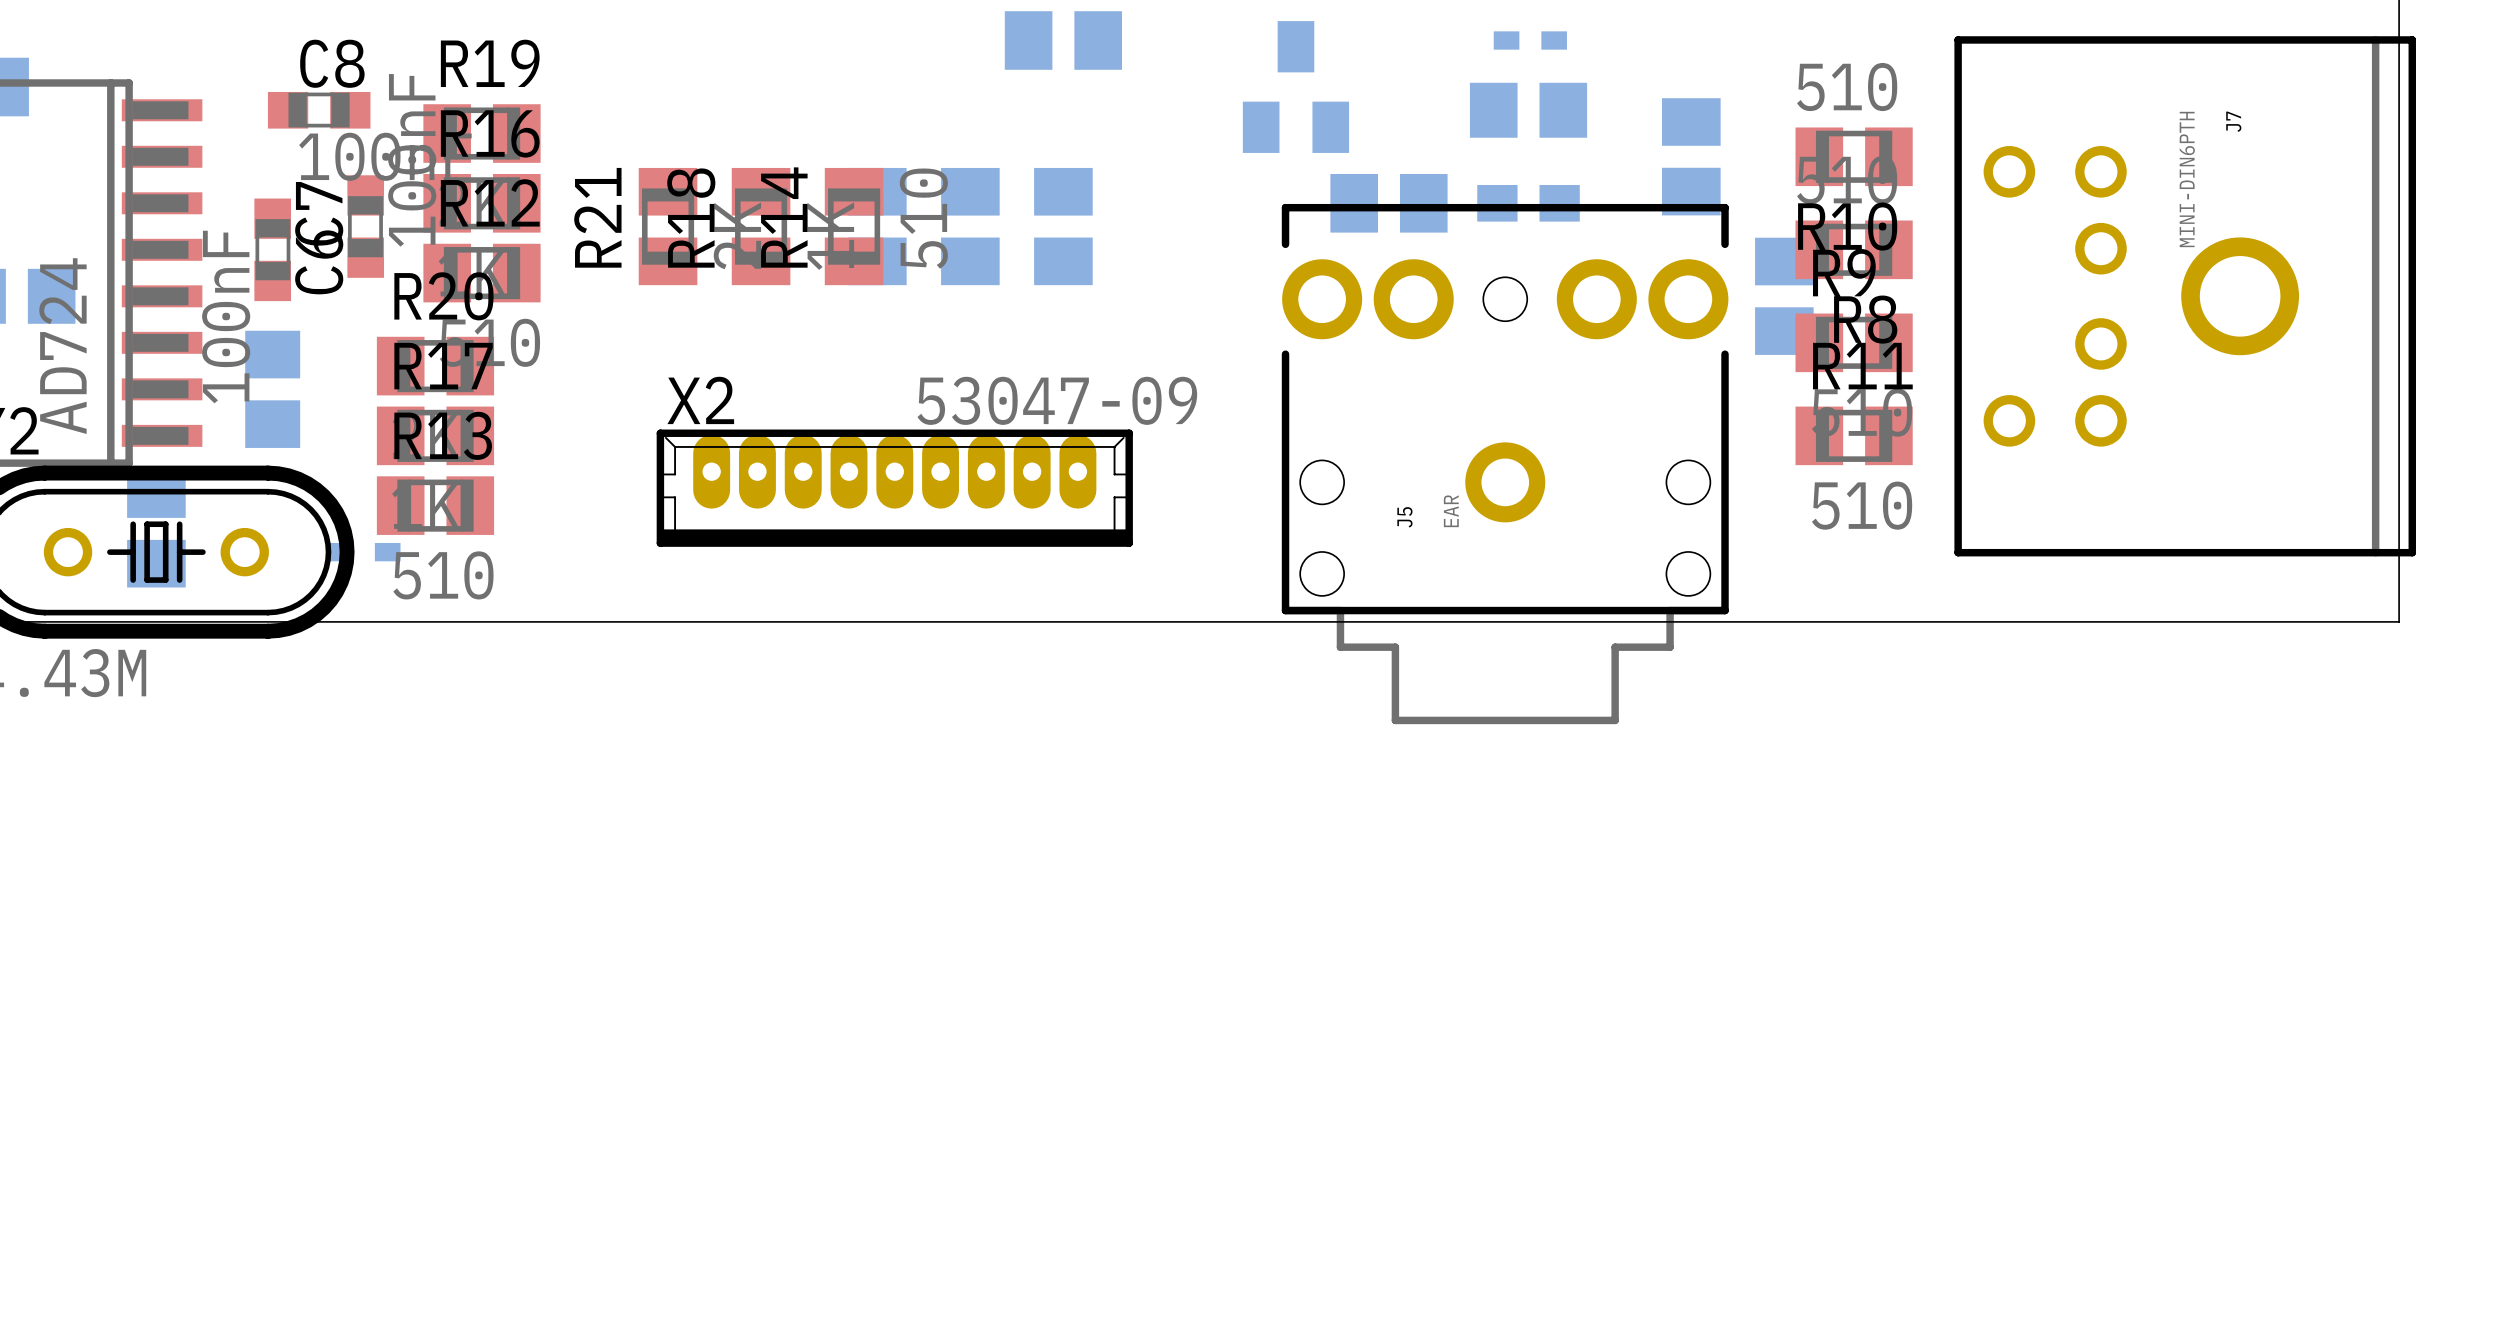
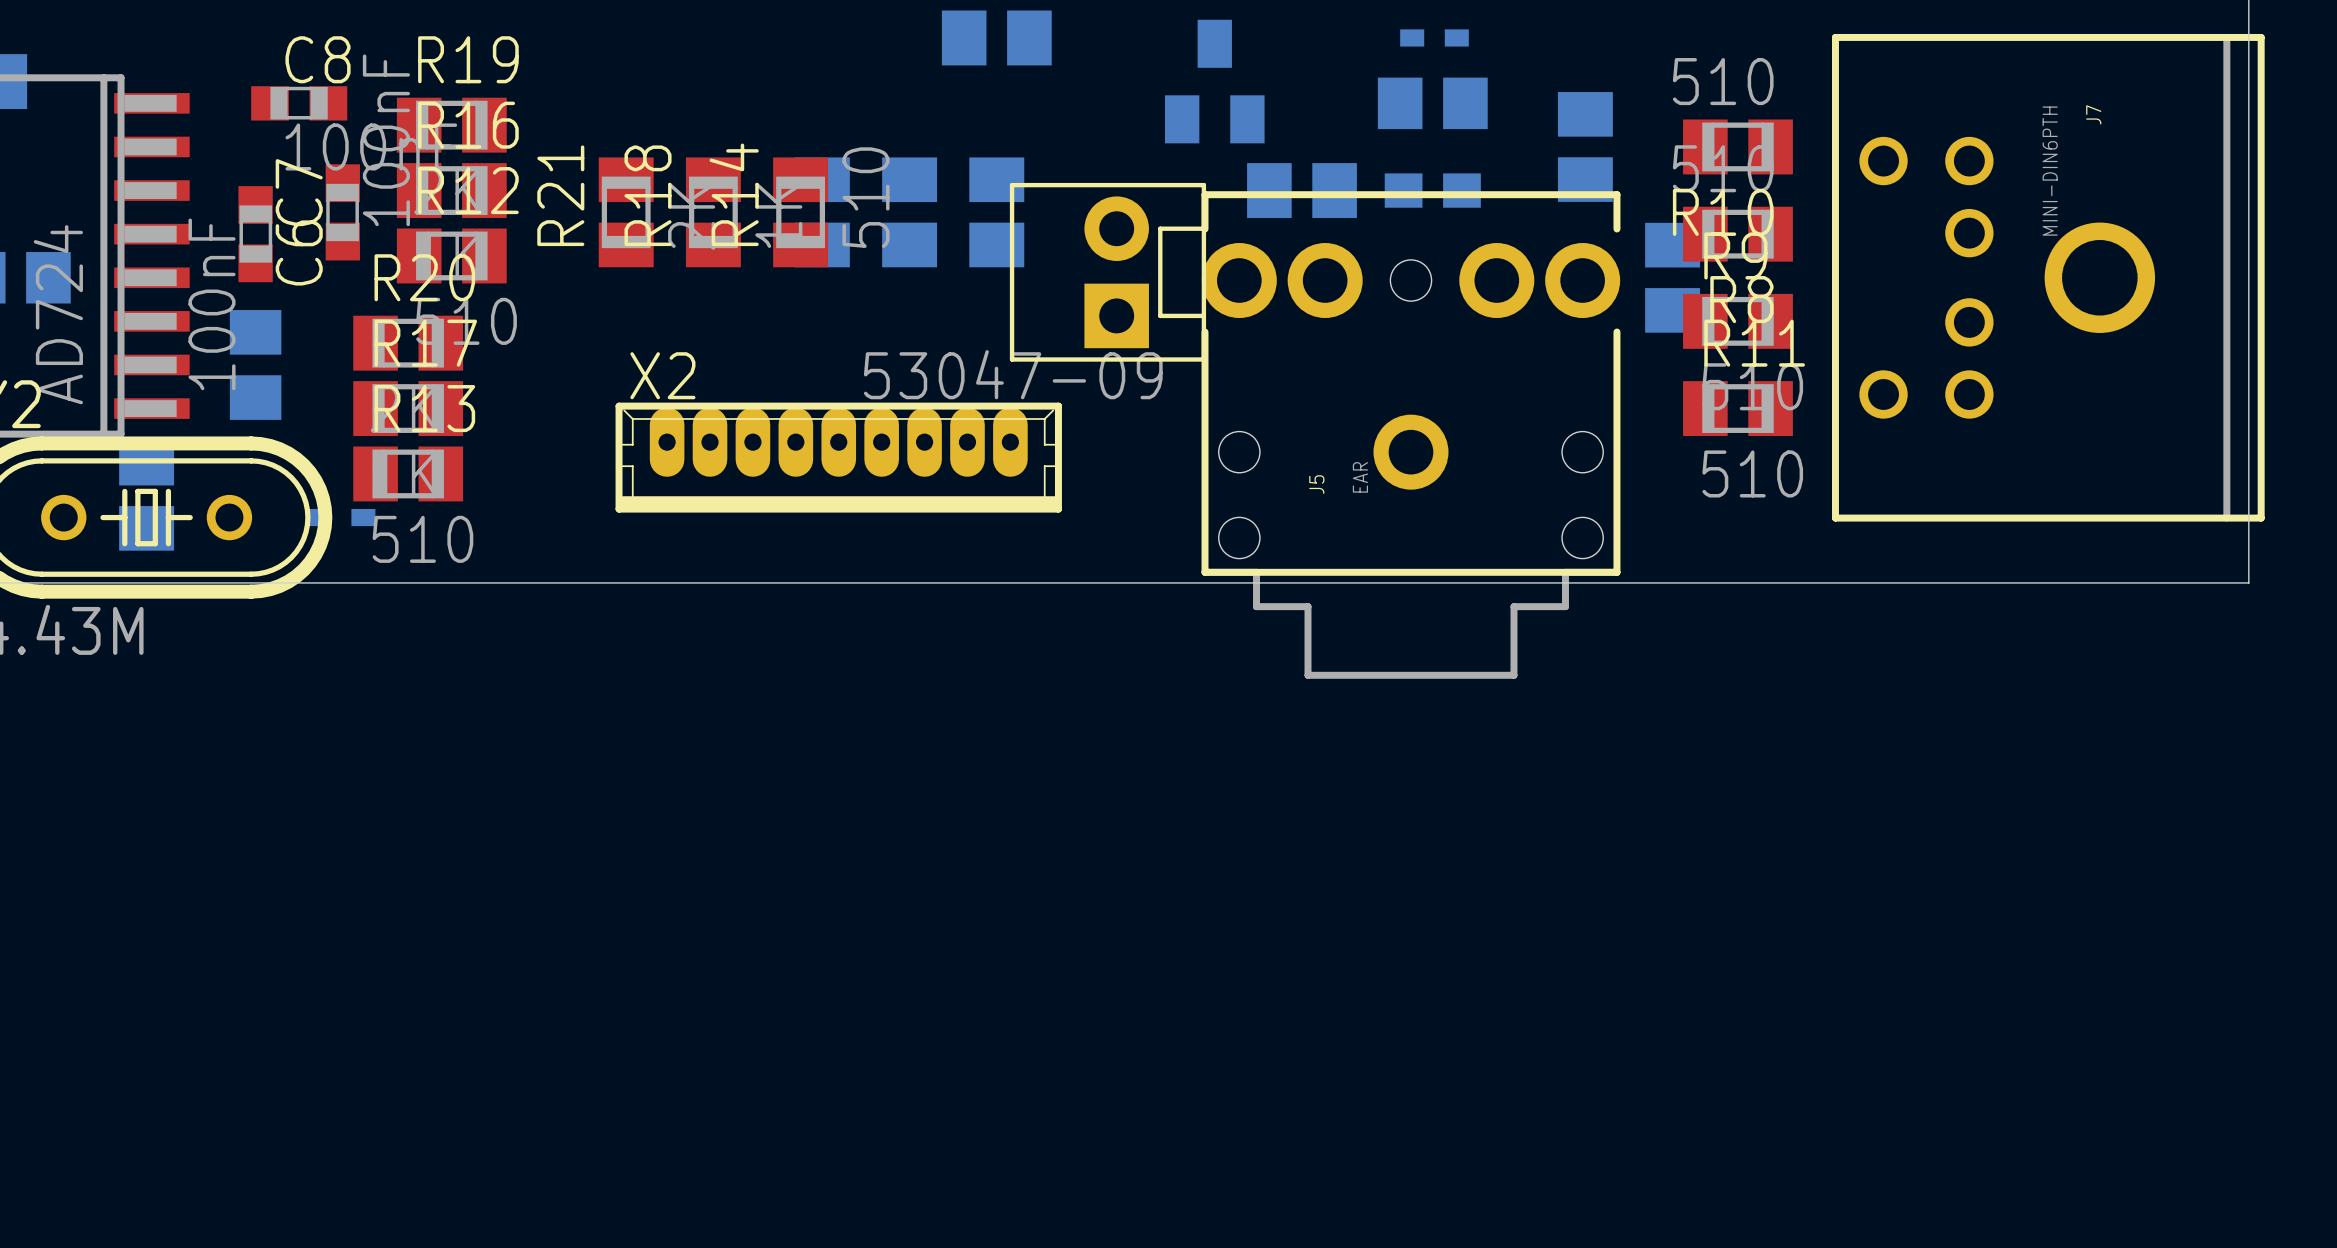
part: none -> (1107, 272)

